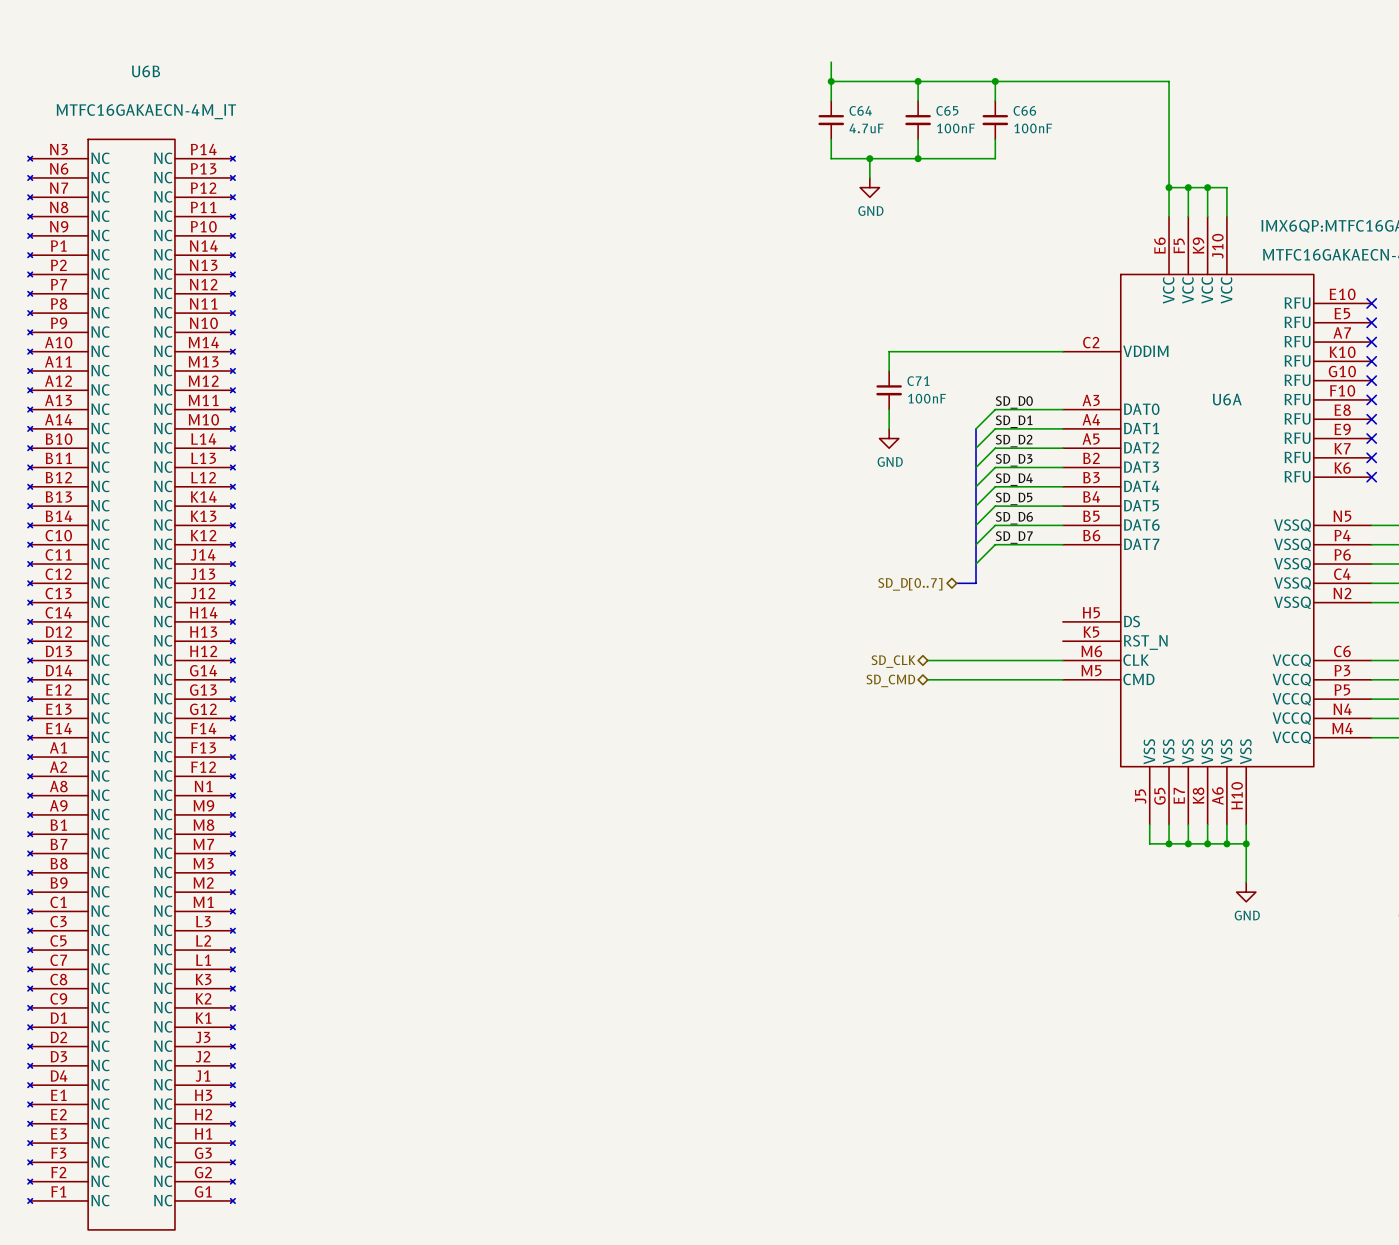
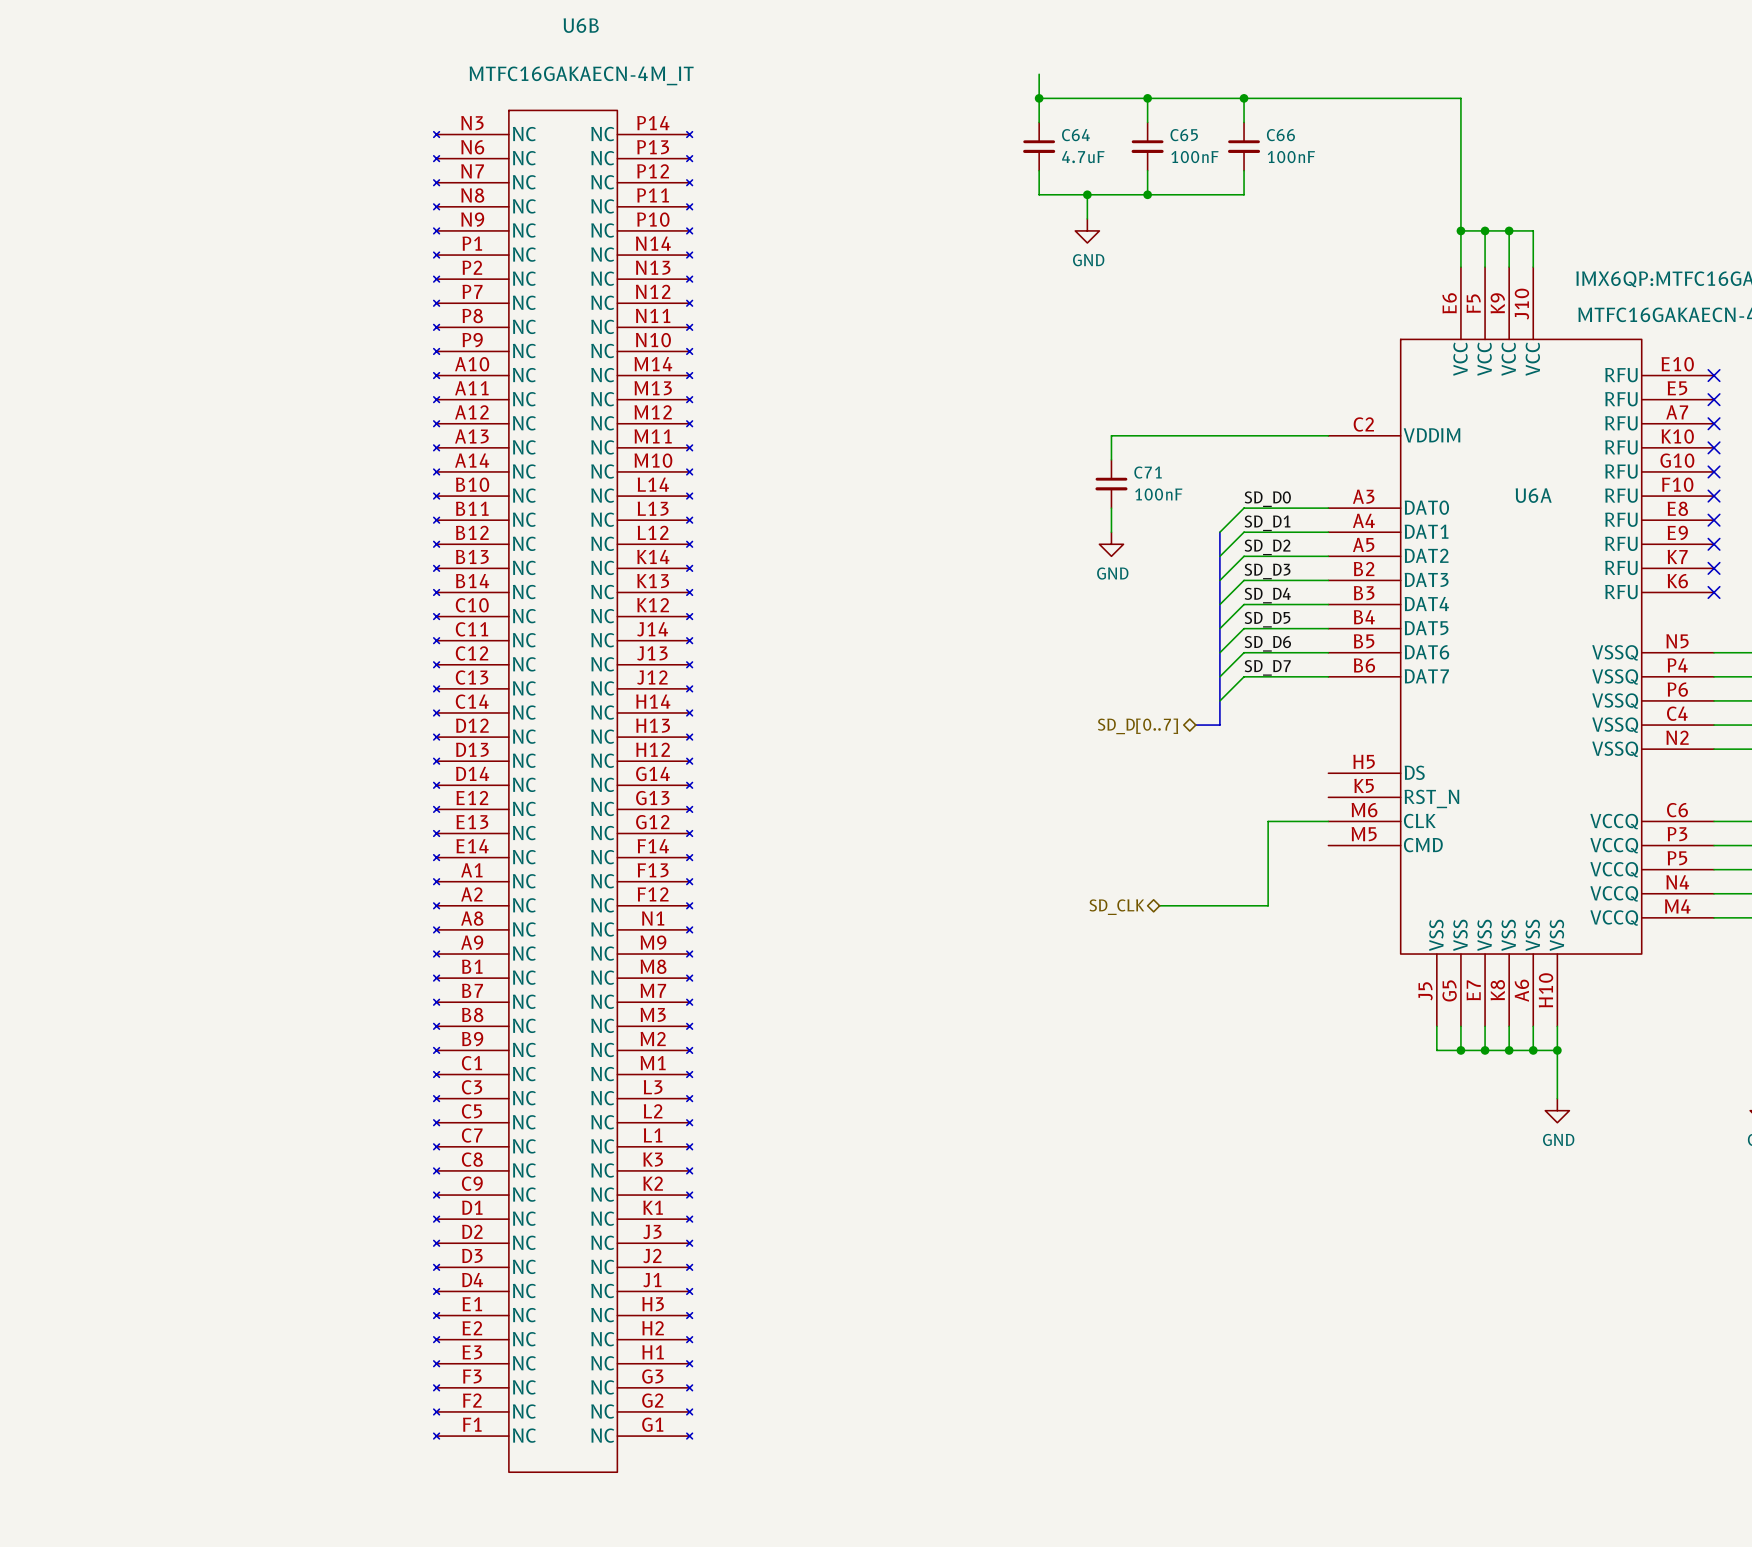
wire: (927, 660) (1014, 660) -> (1159, 905) (1268, 905) (1268, 821)
hierarchical label position: SD_CLK (893, 661) -> SD_CLK (1116, 907)
wire: (927, 679) (1062, 679) -> none
hierarchical label: SD_CMD (890, 680) -> none
U6B position: (131, 684) -> (563, 791)

